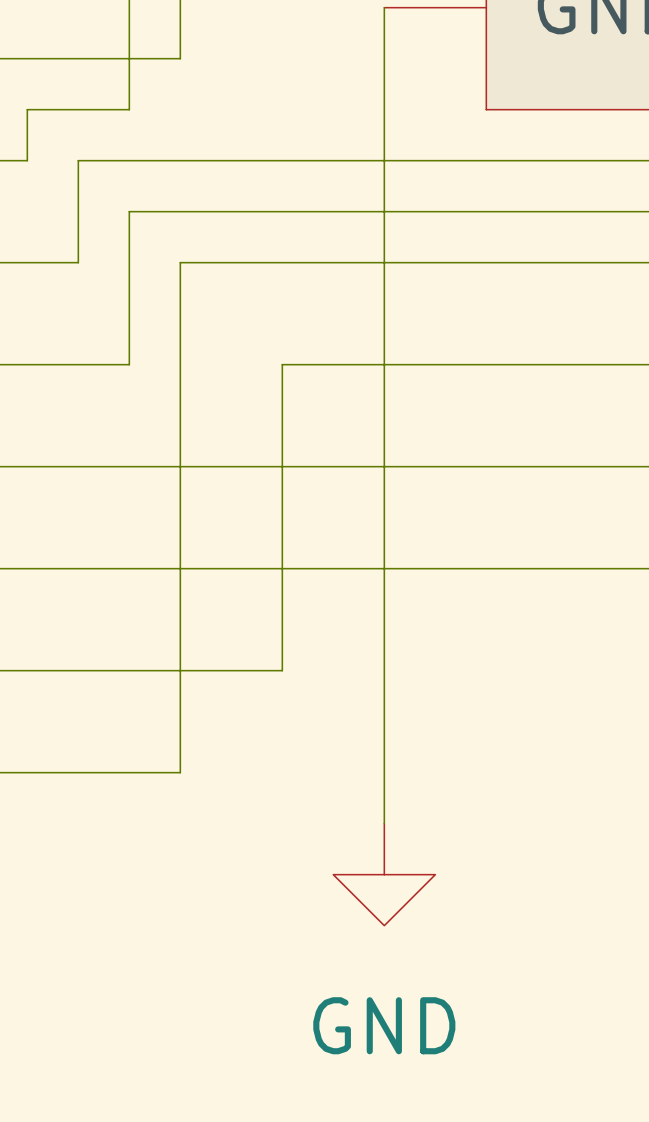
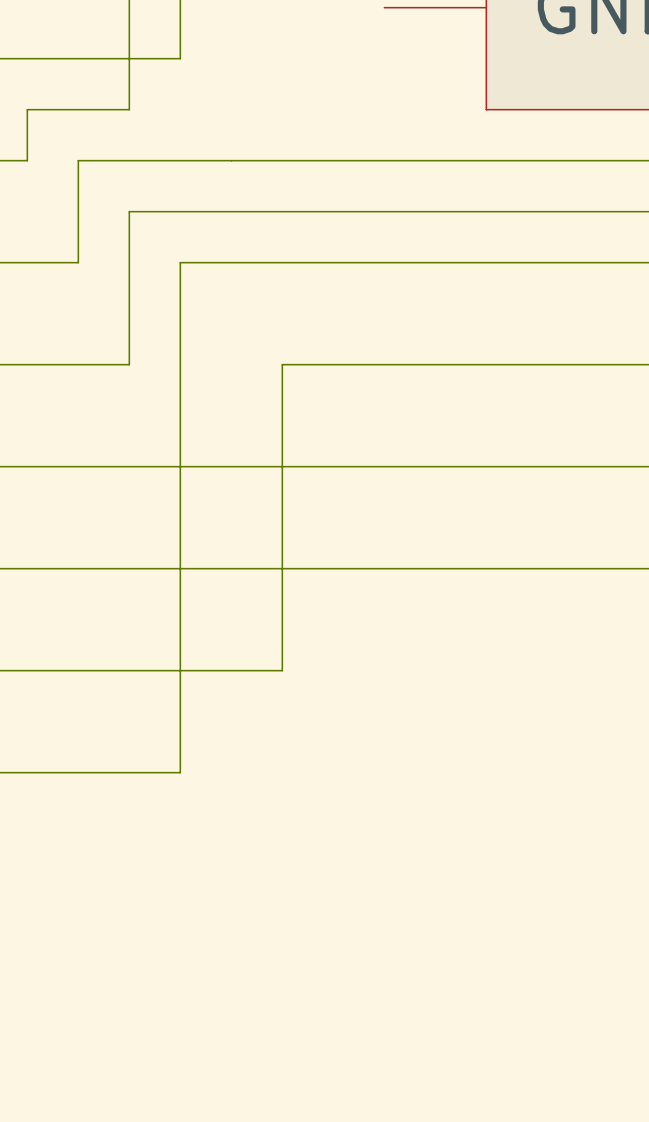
wire: (384, 7) (384, 823) -> none
power symbol: GND (384, 874) -> none

